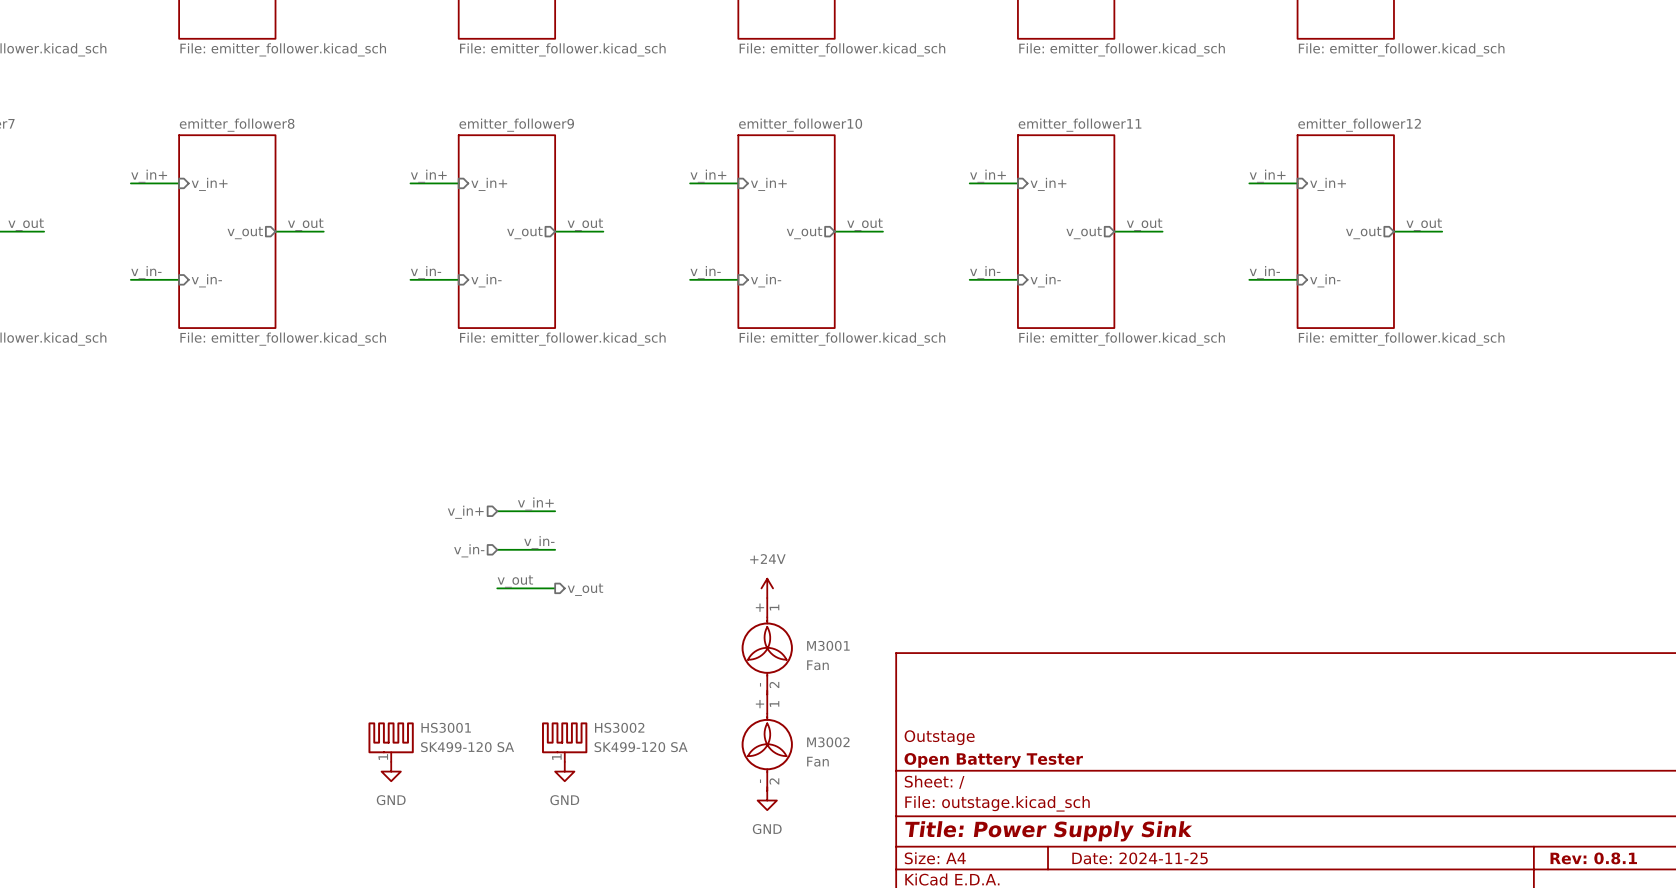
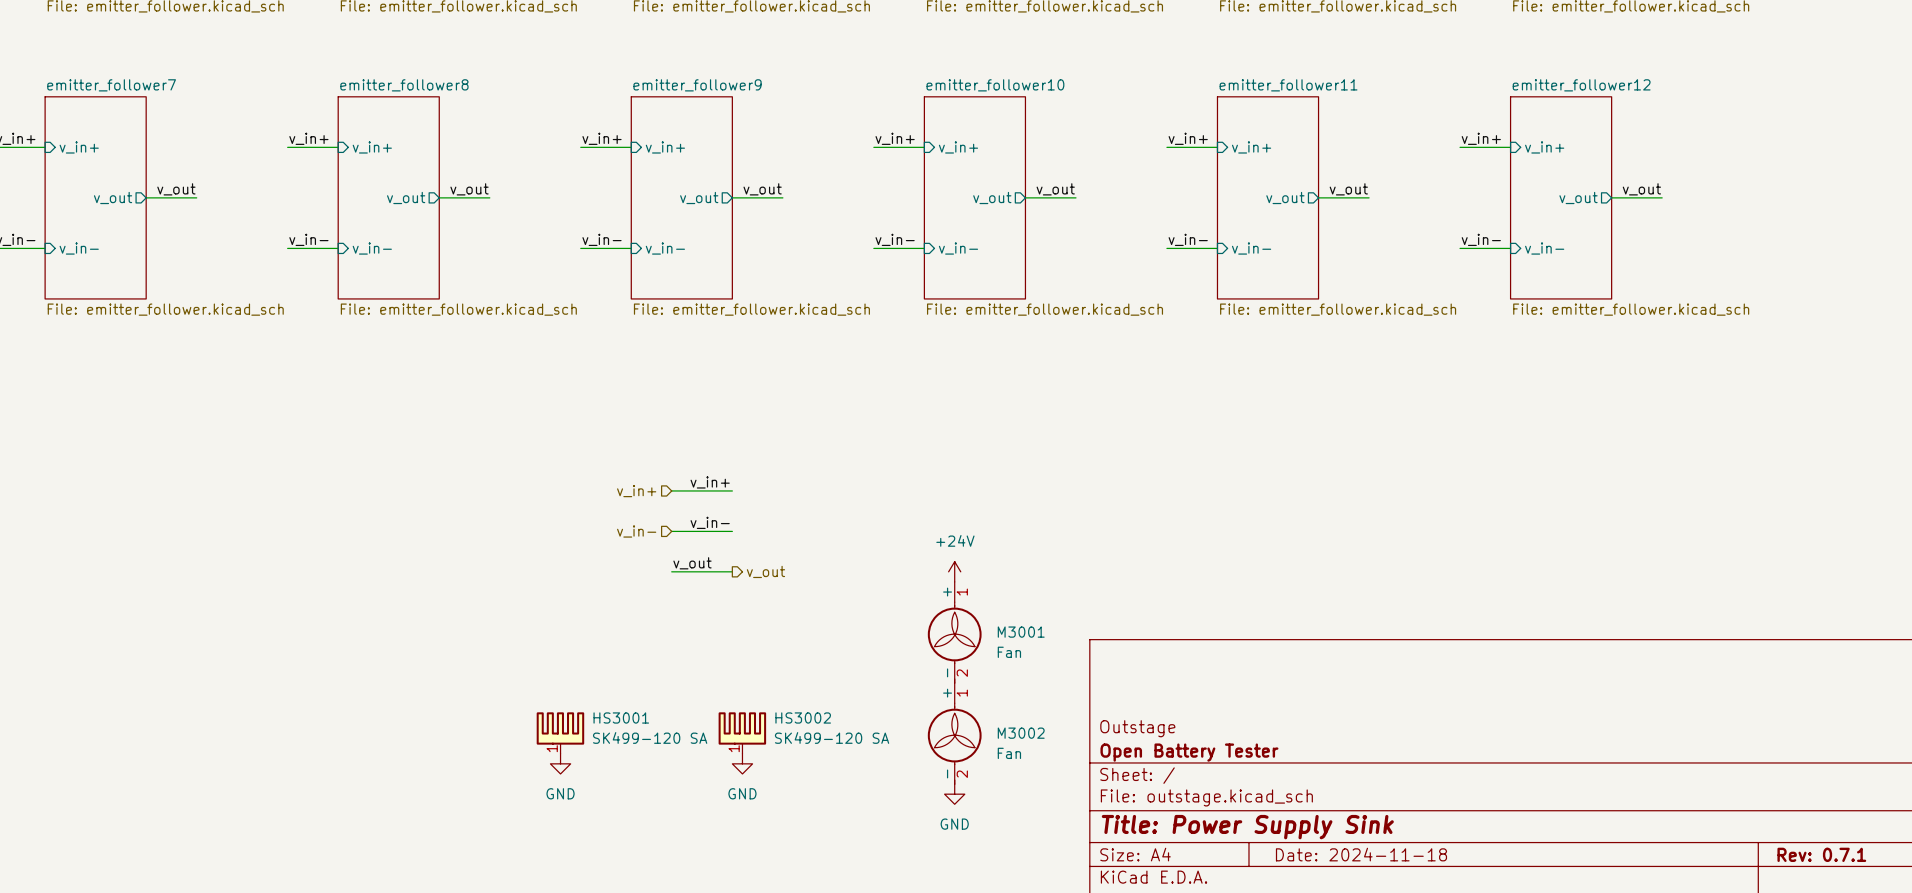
title block: Date: 2024-11-25 (1140, 858) -> Date: 2024-11-18 (1361, 854)
title block: Rev: 0.8.1 (1593, 858) -> Rev: 0.7.1 (1821, 854)

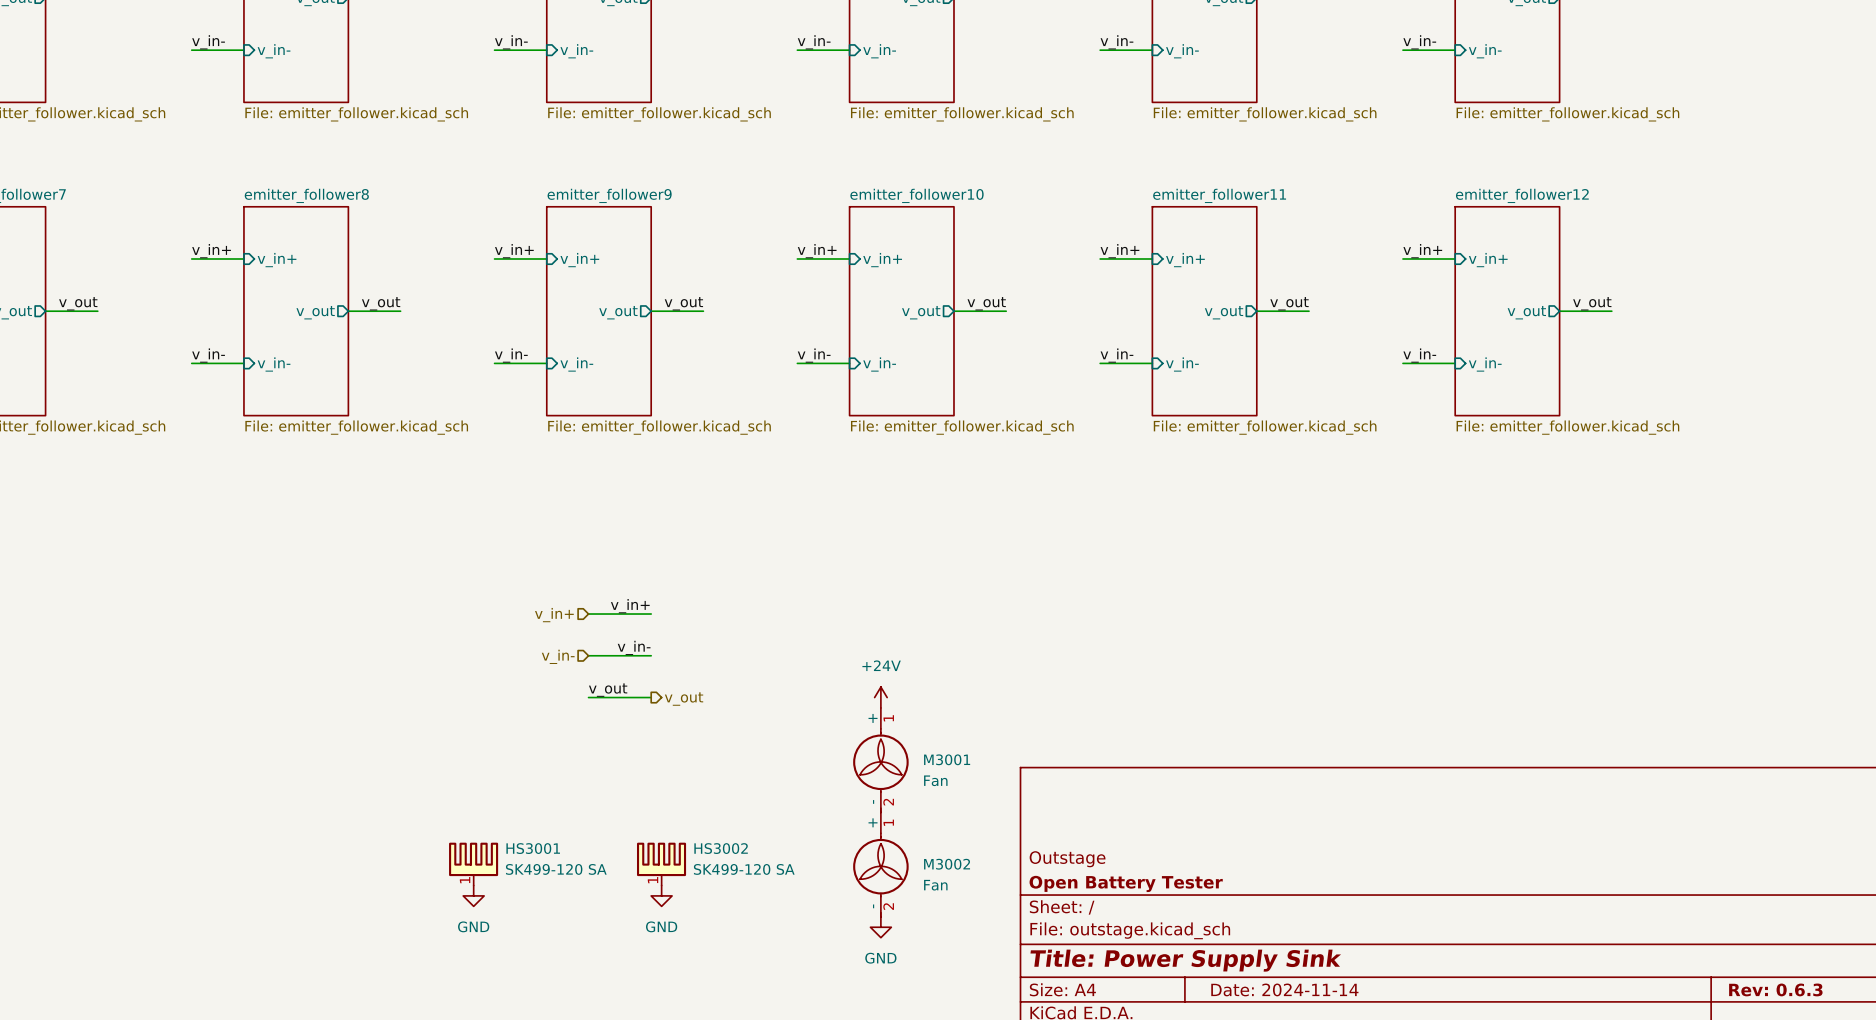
title block: Date: 2024-11-18 (1361, 854) -> Date: 2024-11-14 (1284, 989)
title block: Rev: 0.7.1 (1821, 854) -> Rev: 0.6.3 (1775, 989)

